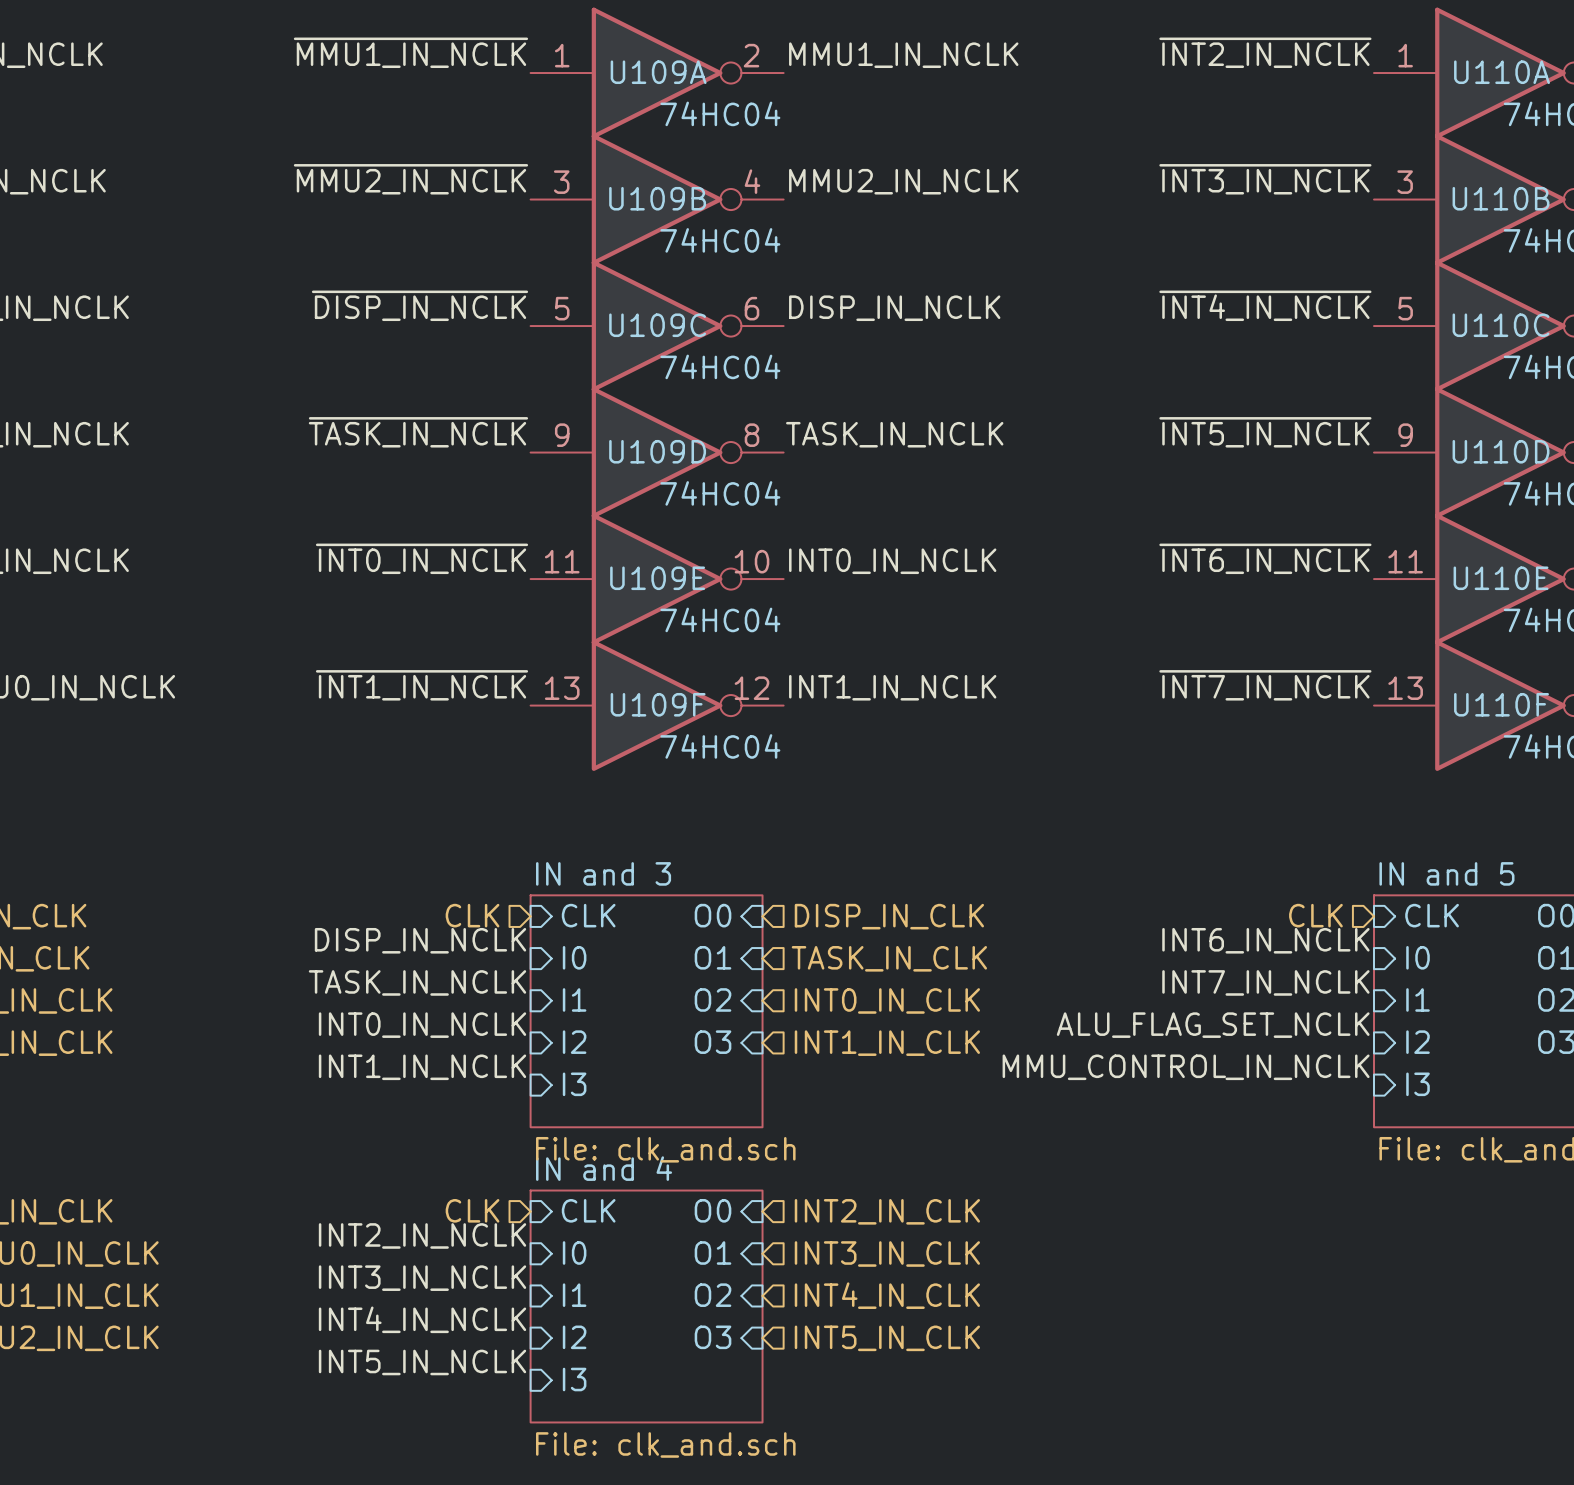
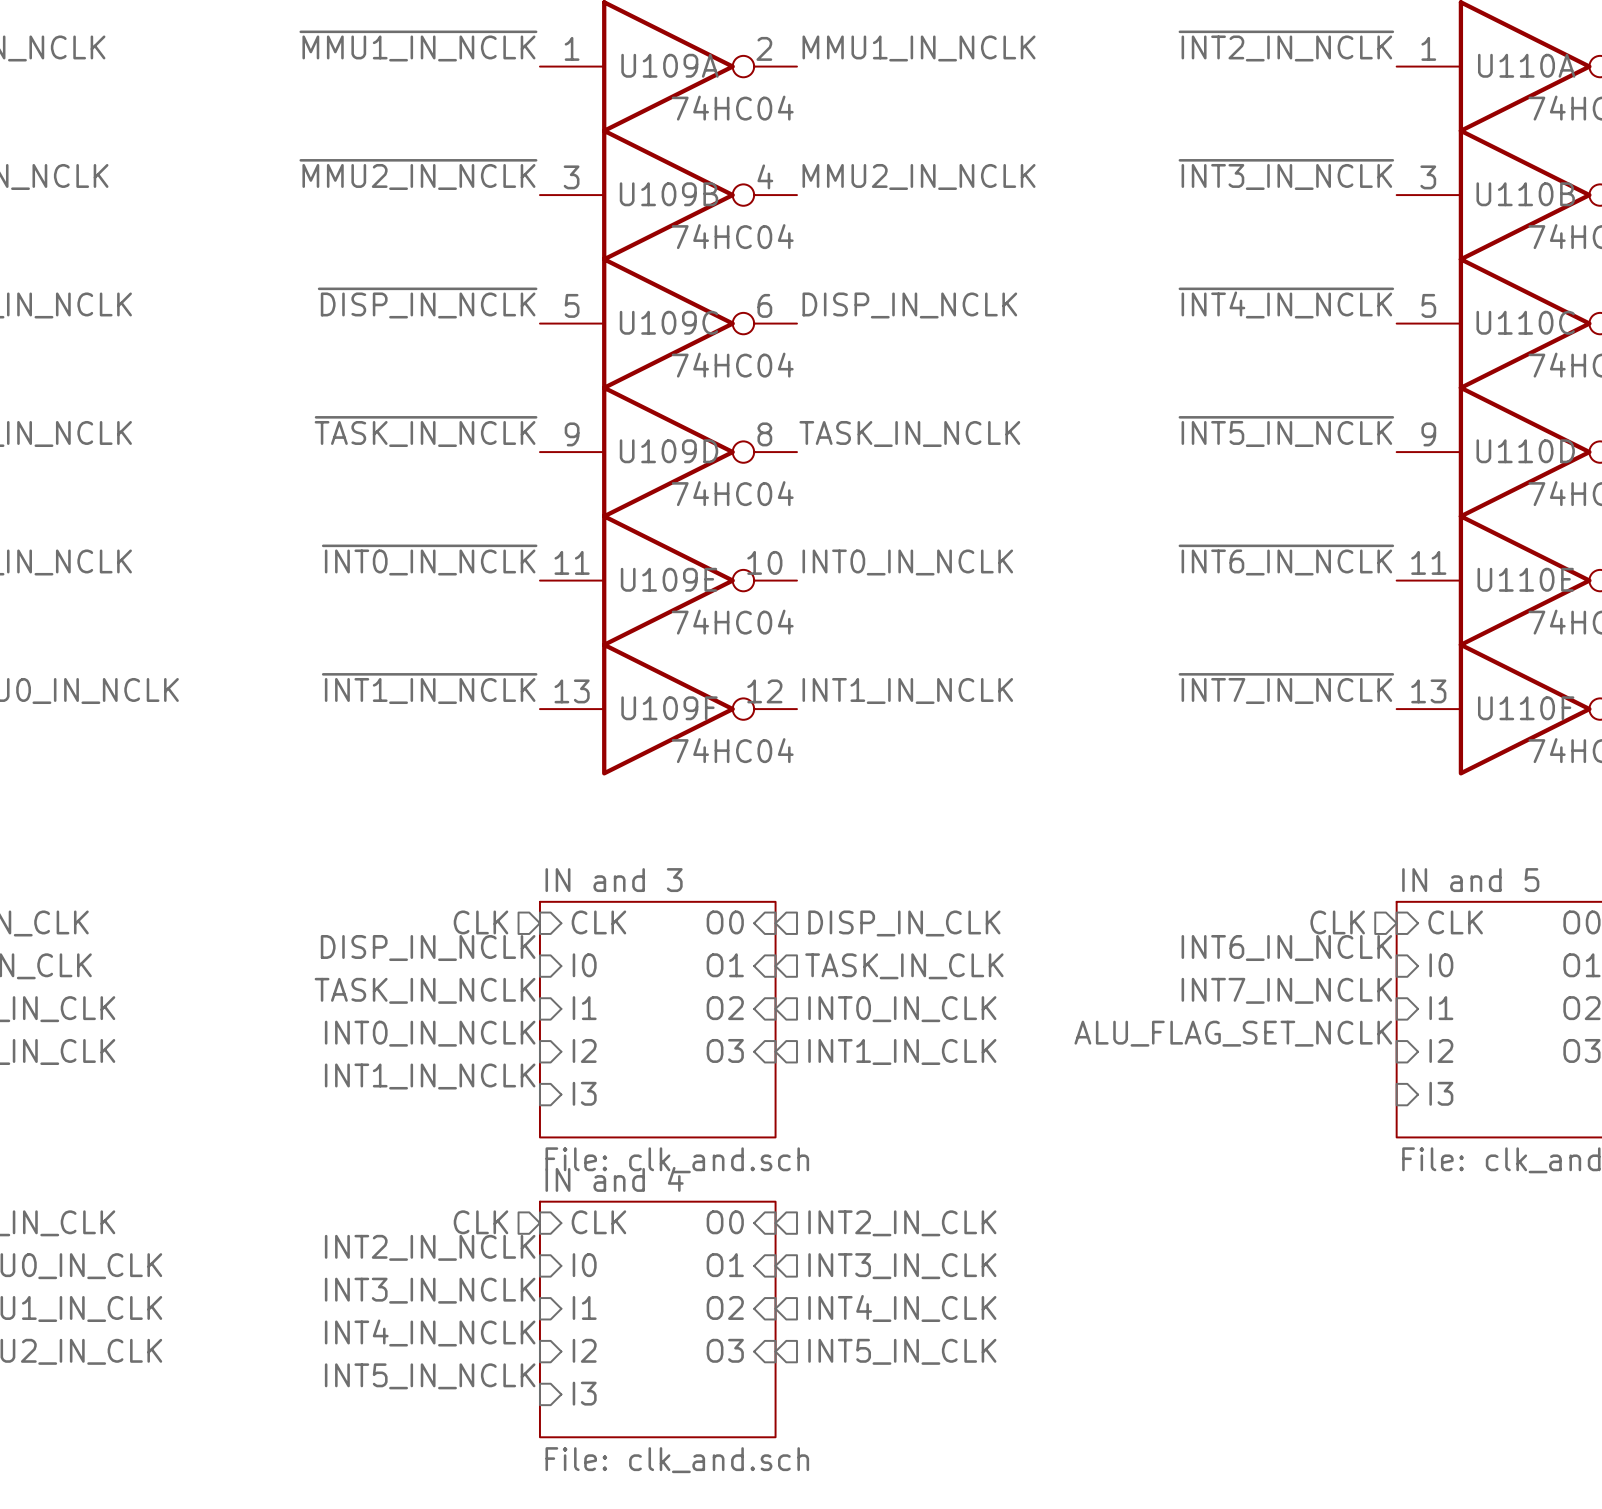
label: MMU_CONTROL_IN_NCLK (1186, 1067) -> none

